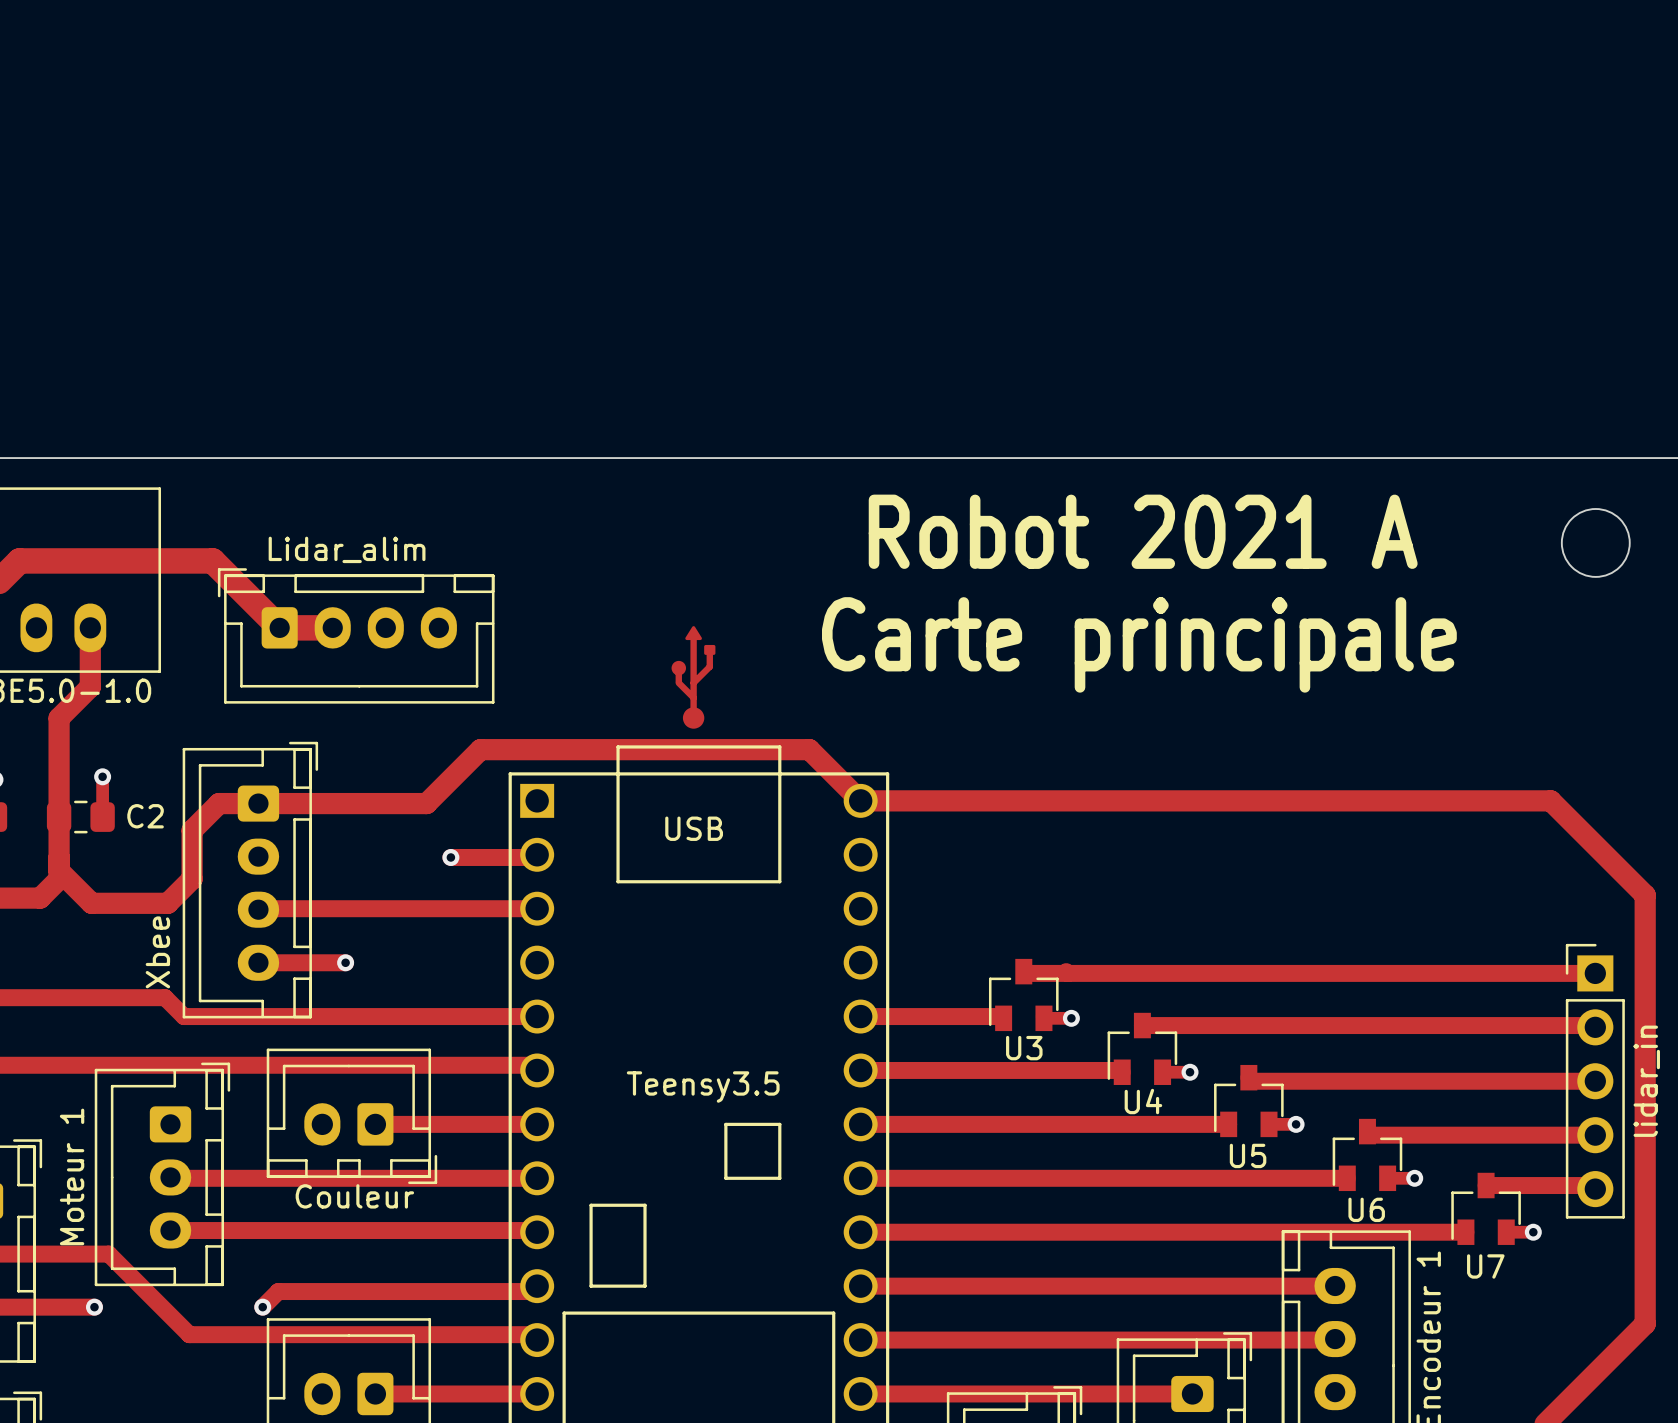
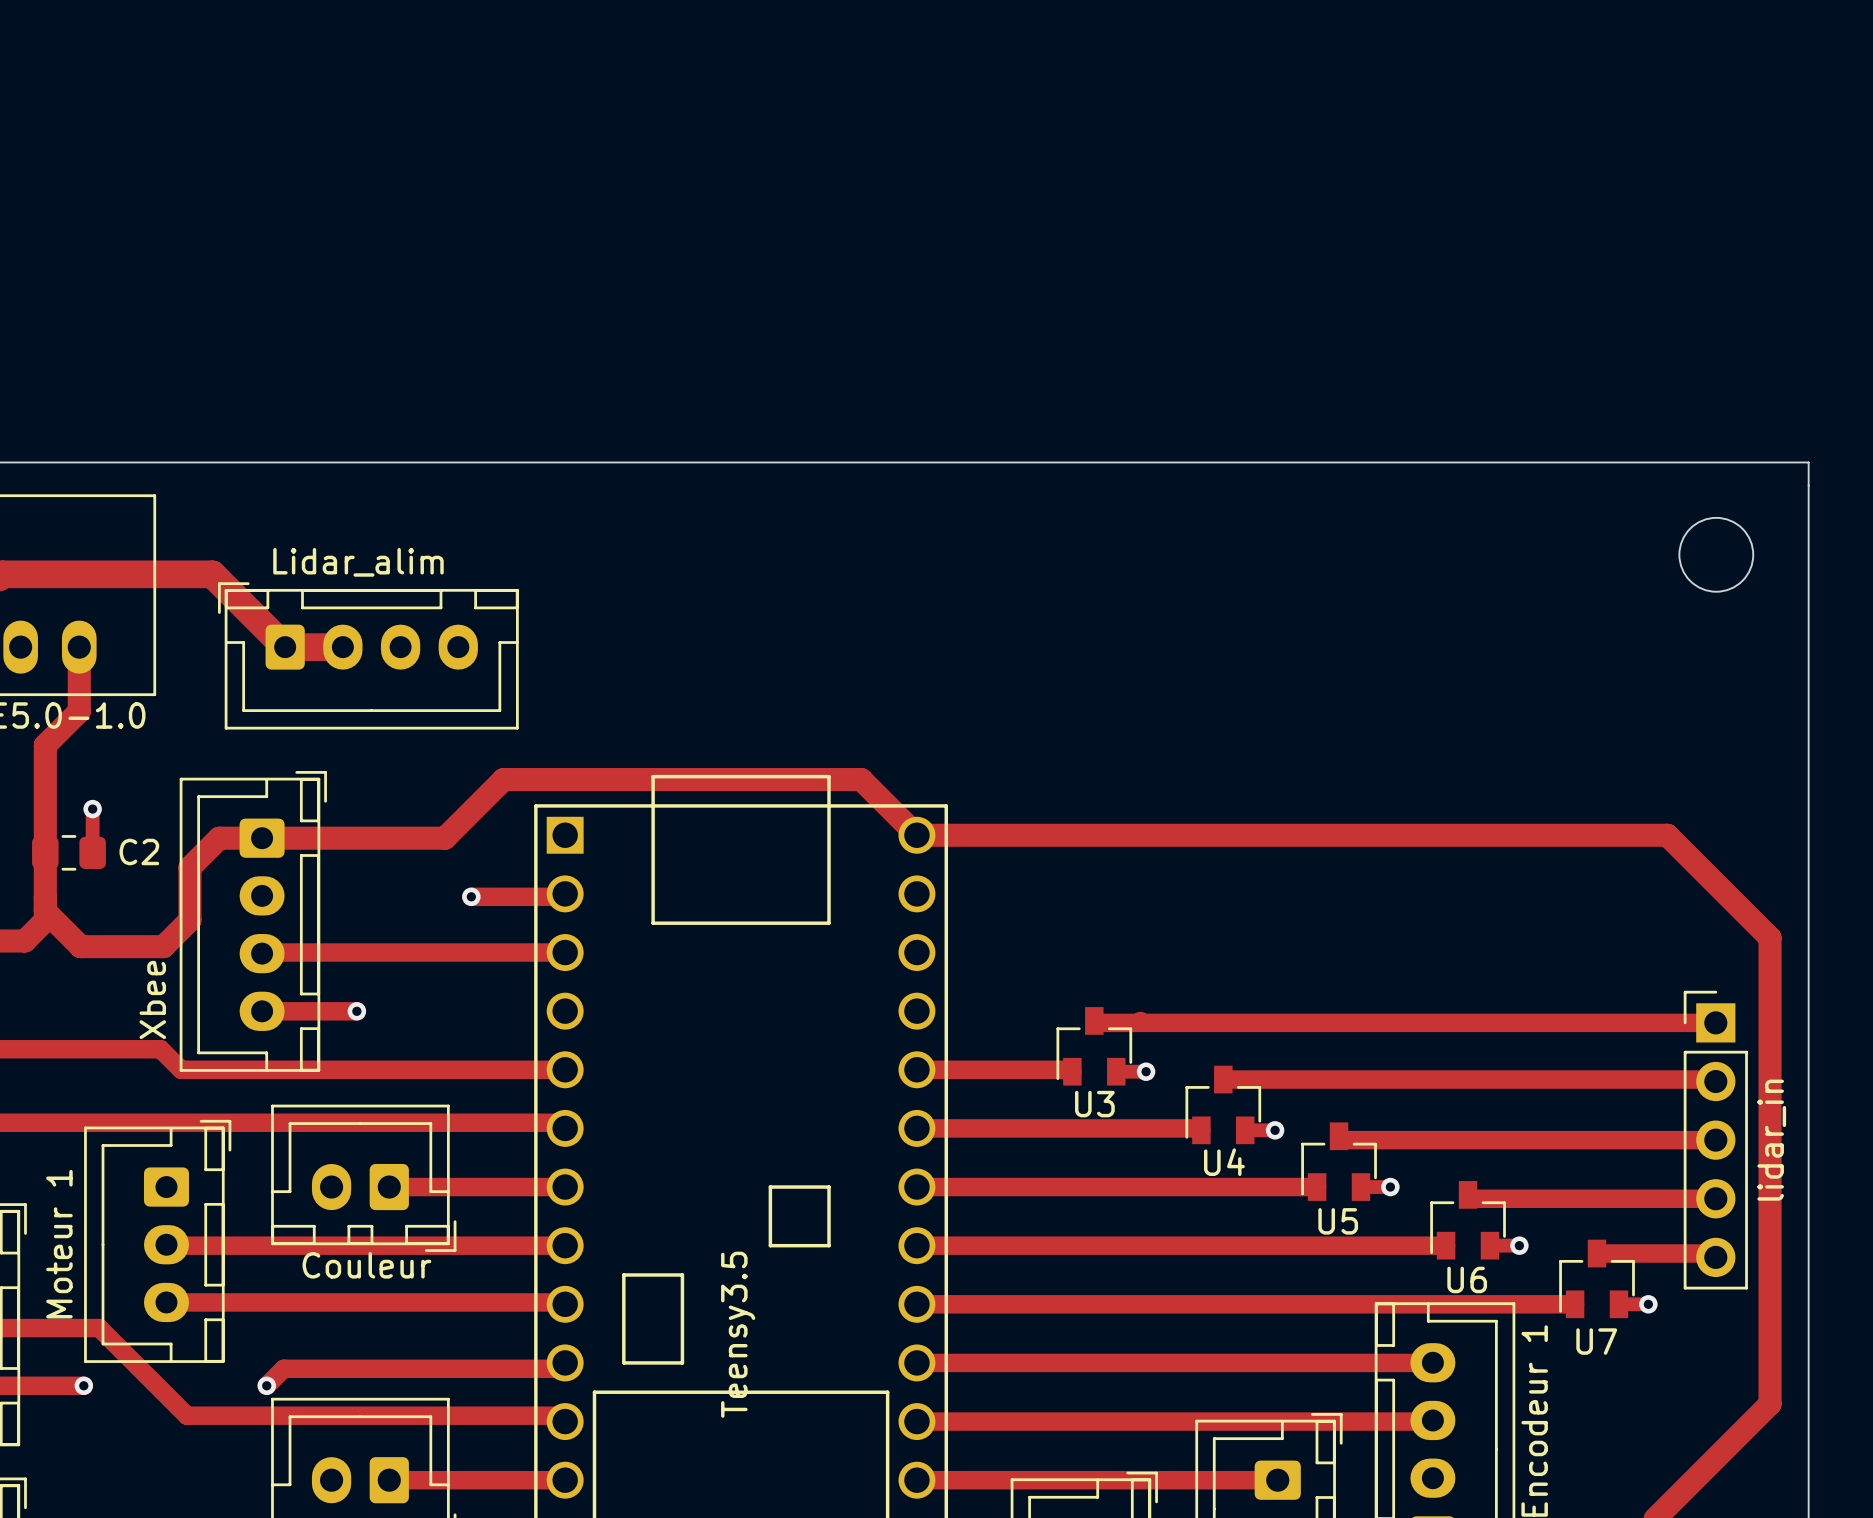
text: Robot 2021 A (1143, 531) -> none
drawing: [671, 626, 716, 729] -> none
text: Carte principale (1139, 644) -> none
text: USB (694, 828) -> none
part value rotation: 0° (703, 1087) -> 90° counterclockwise (738, 1334)

